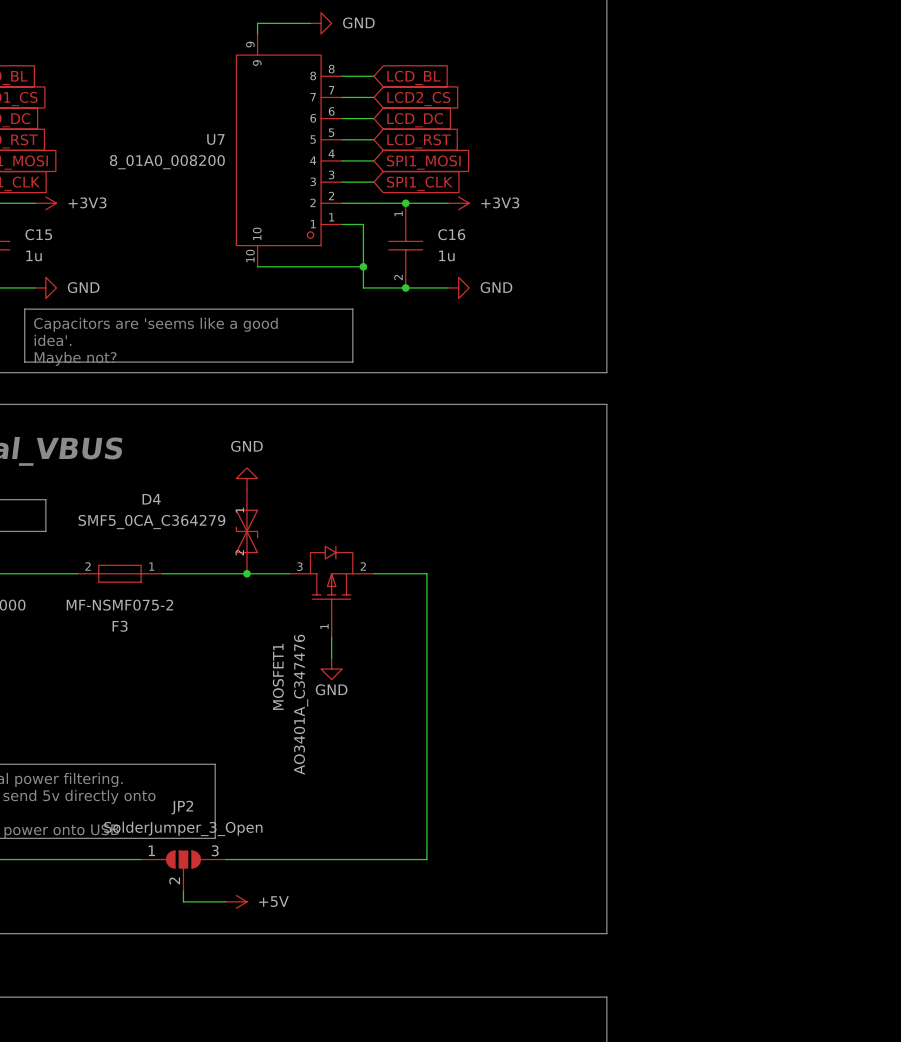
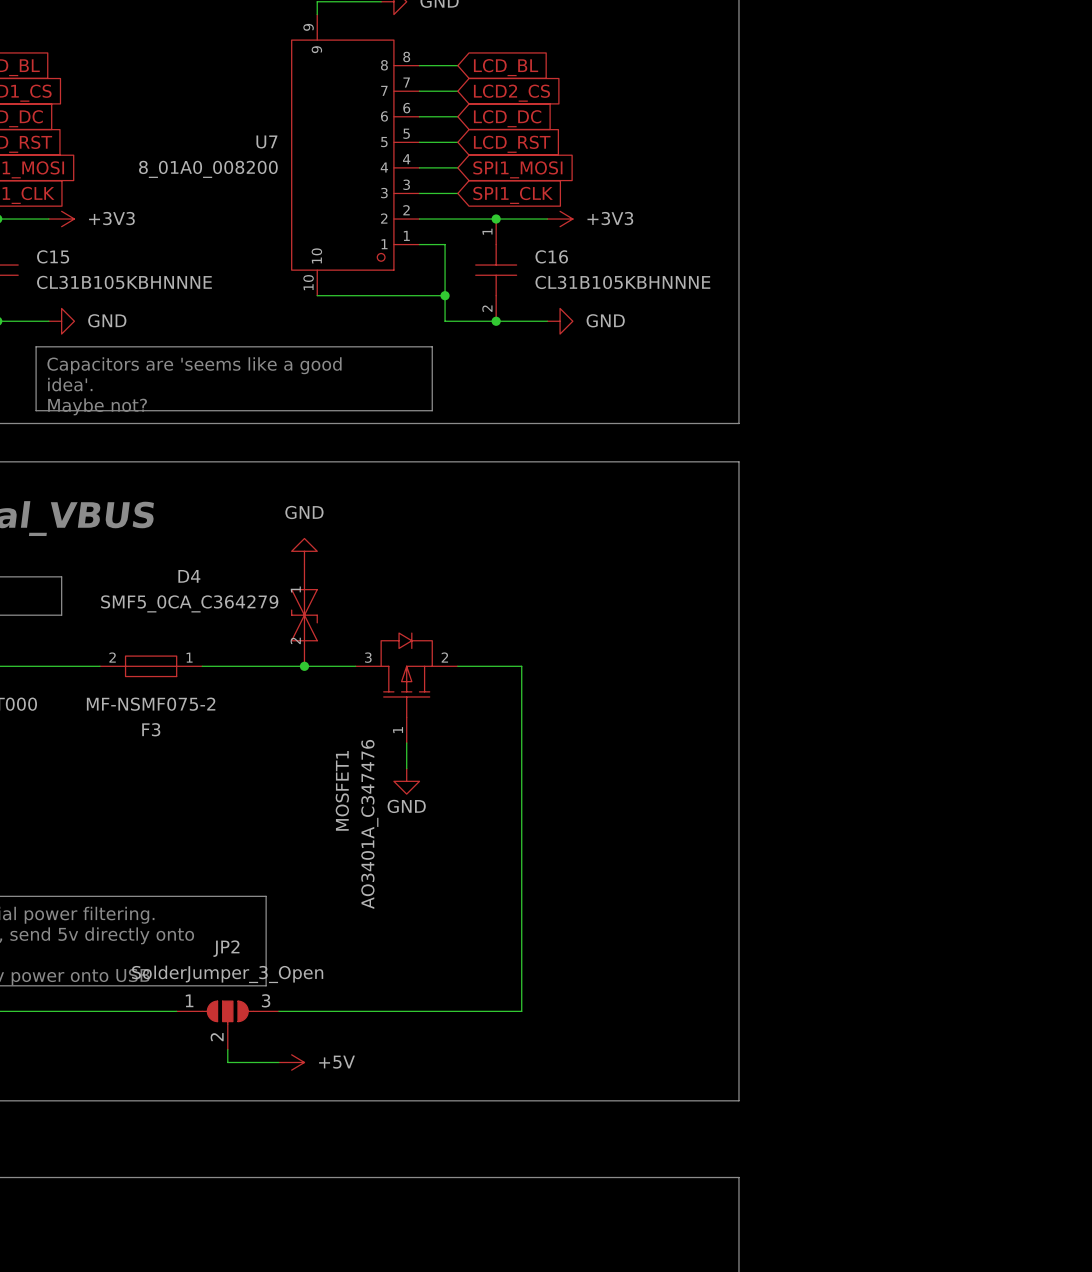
C15 value: 1u (34, 255) -> CL31B105KBHNNNE (124, 282)
C16 value: 1u (446, 255) -> CL31B105KBHNNNE (622, 282)

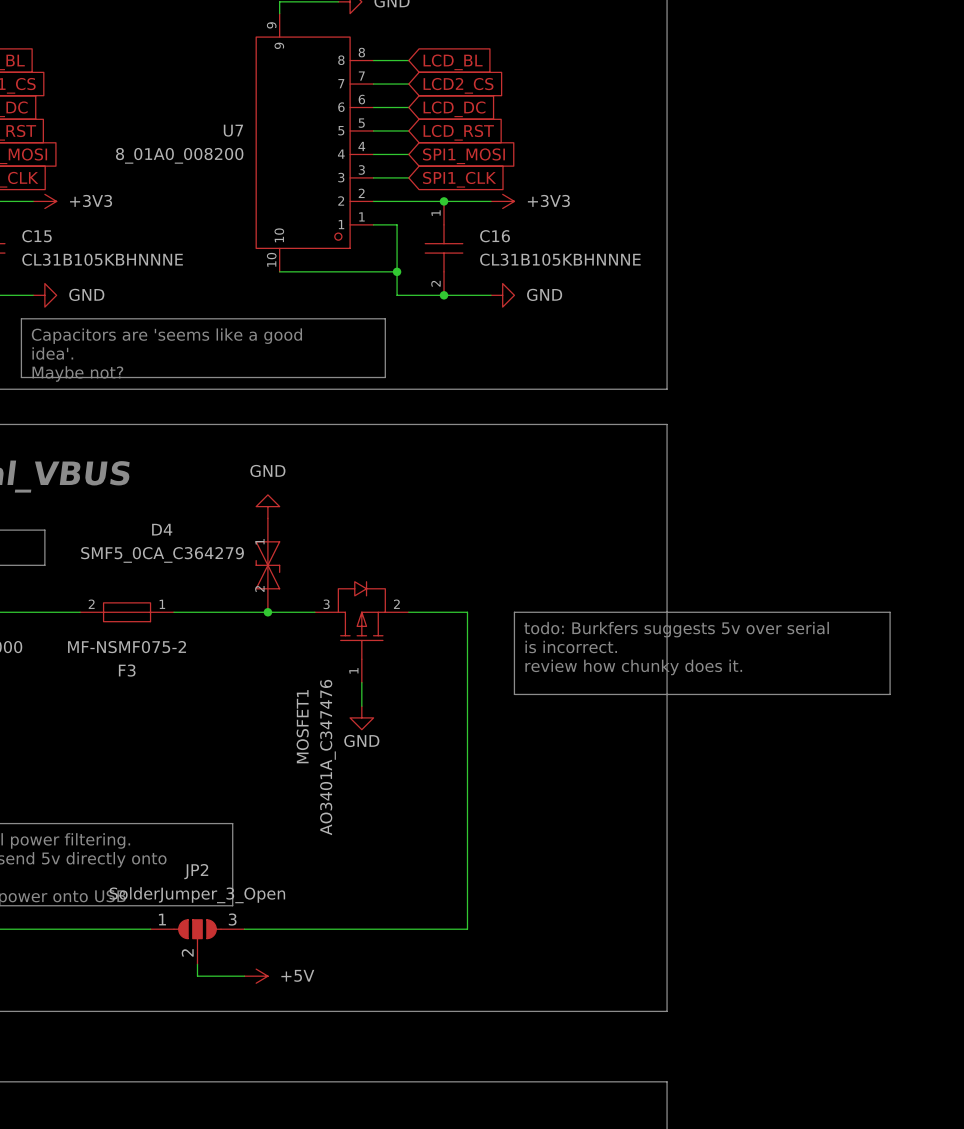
line: none -> (514, 612) (890, 612) (890, 694) (514, 694) (514, 612)
text: none -> todo: Burkfers suggests 5v over serial (676, 629)
text: none -> is incorrect. (571, 646)
text: none -> review how chunky does it. (633, 667)

